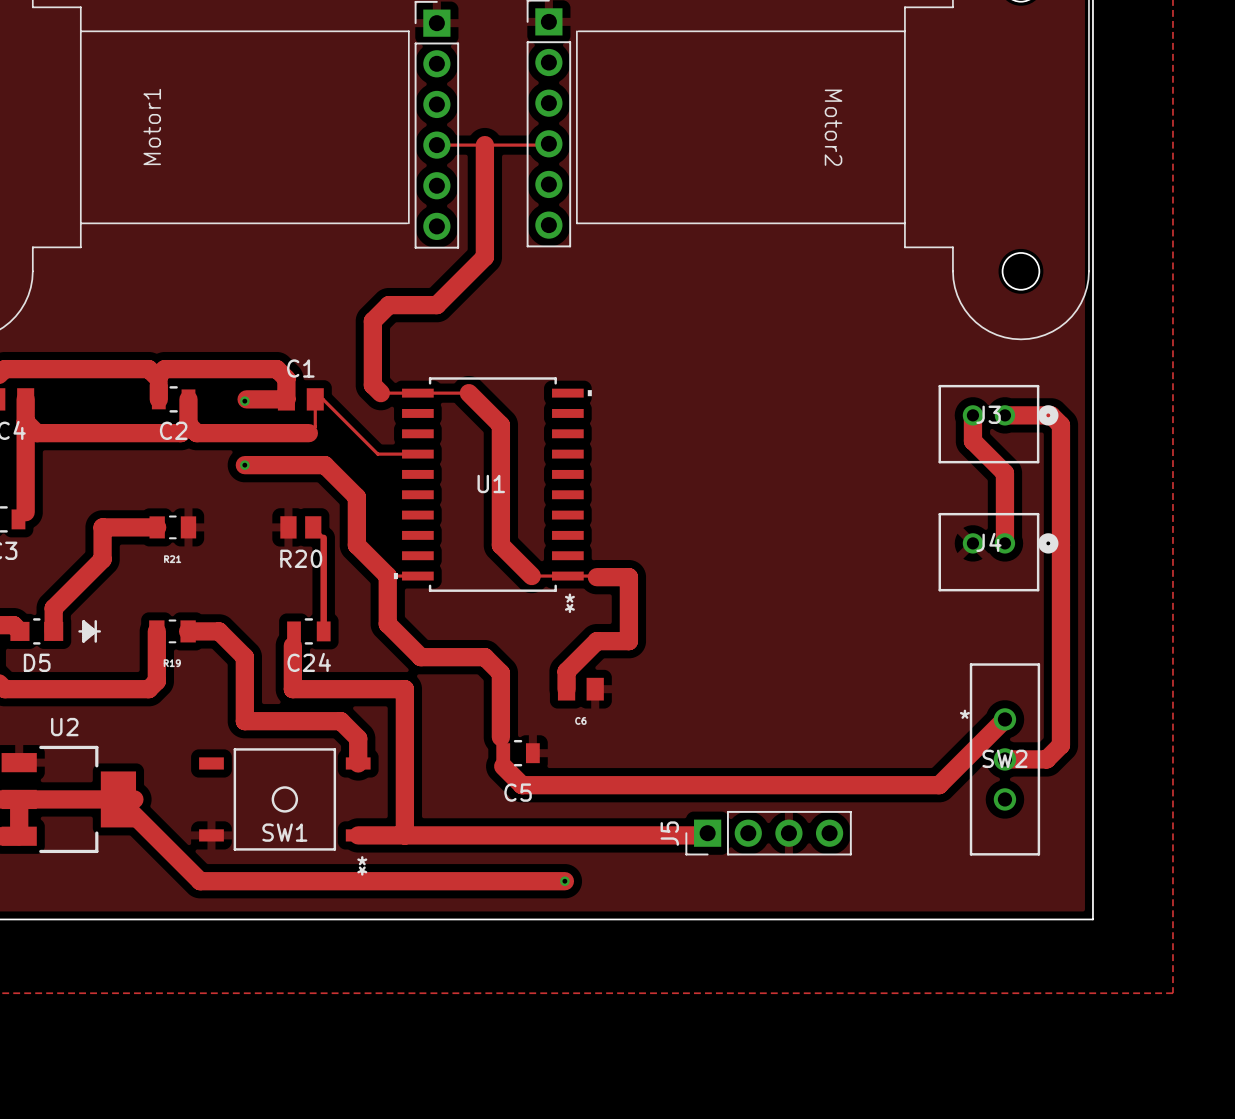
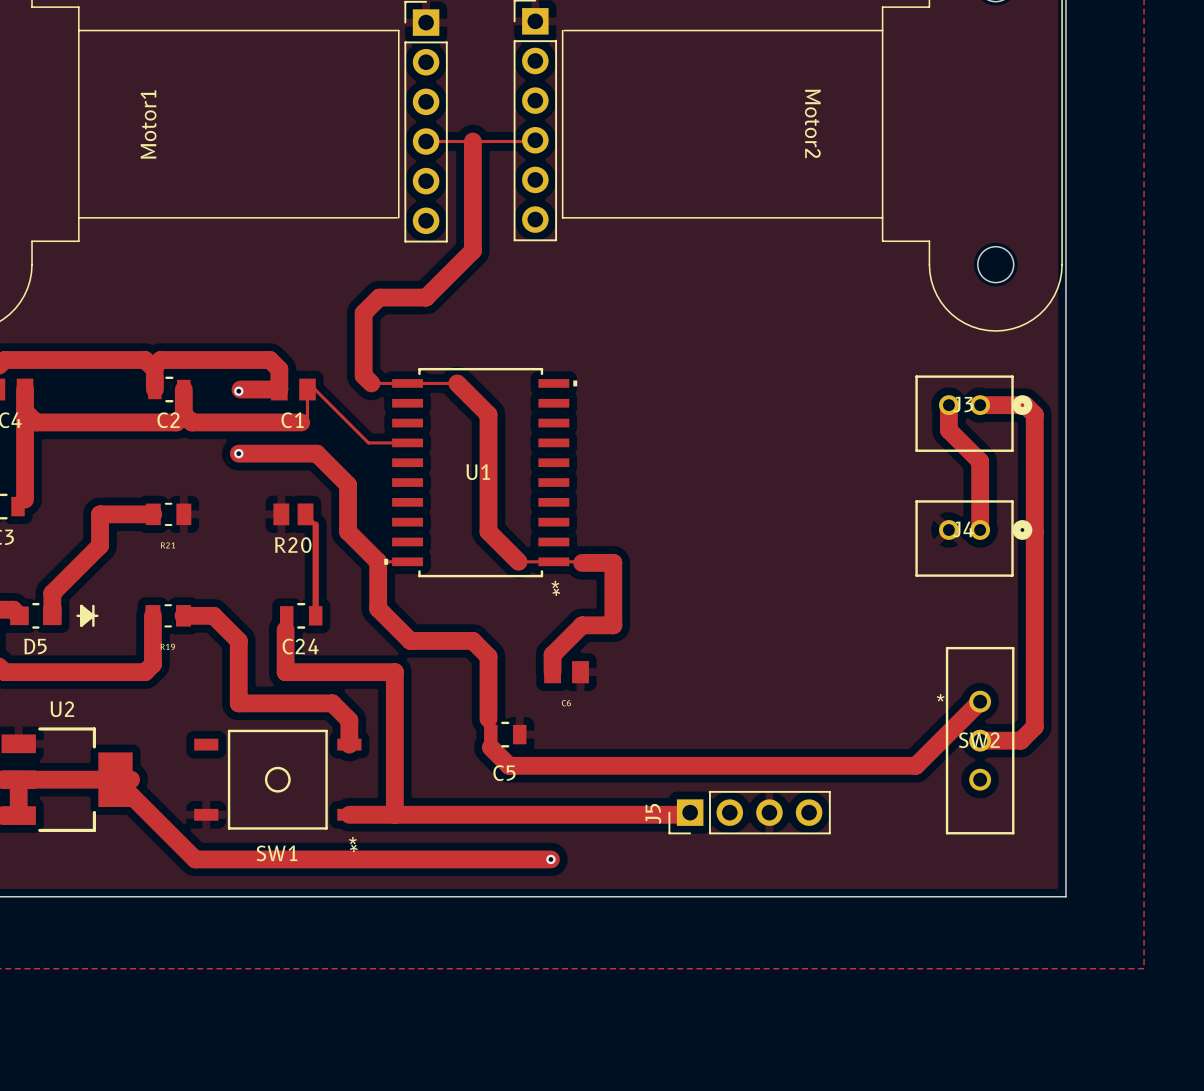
C1 name position: C1 (300, 368) -> C1 (292, 420)
SW1 name position: SW1 (284, 832) -> SW1 (276, 853)

